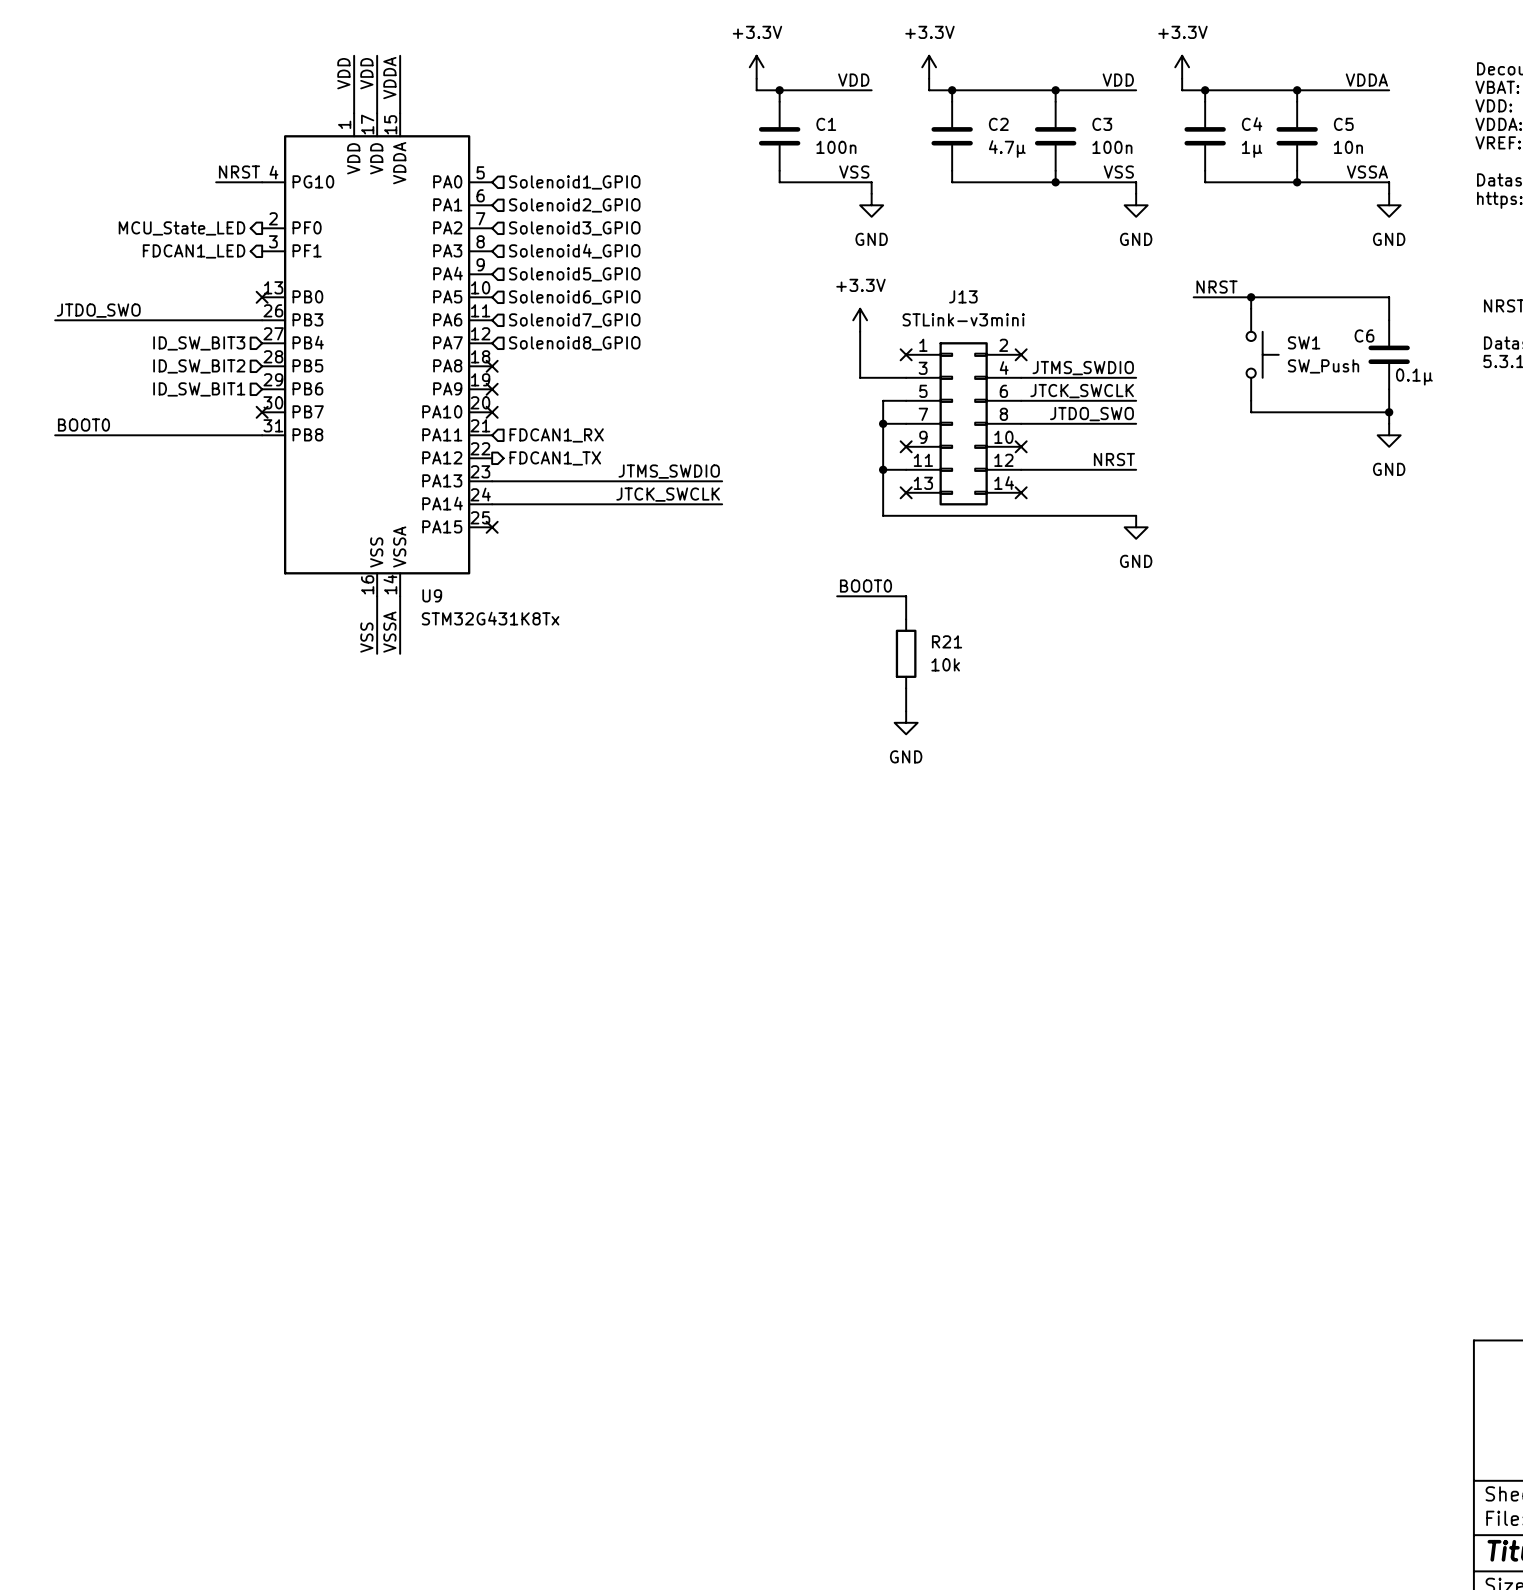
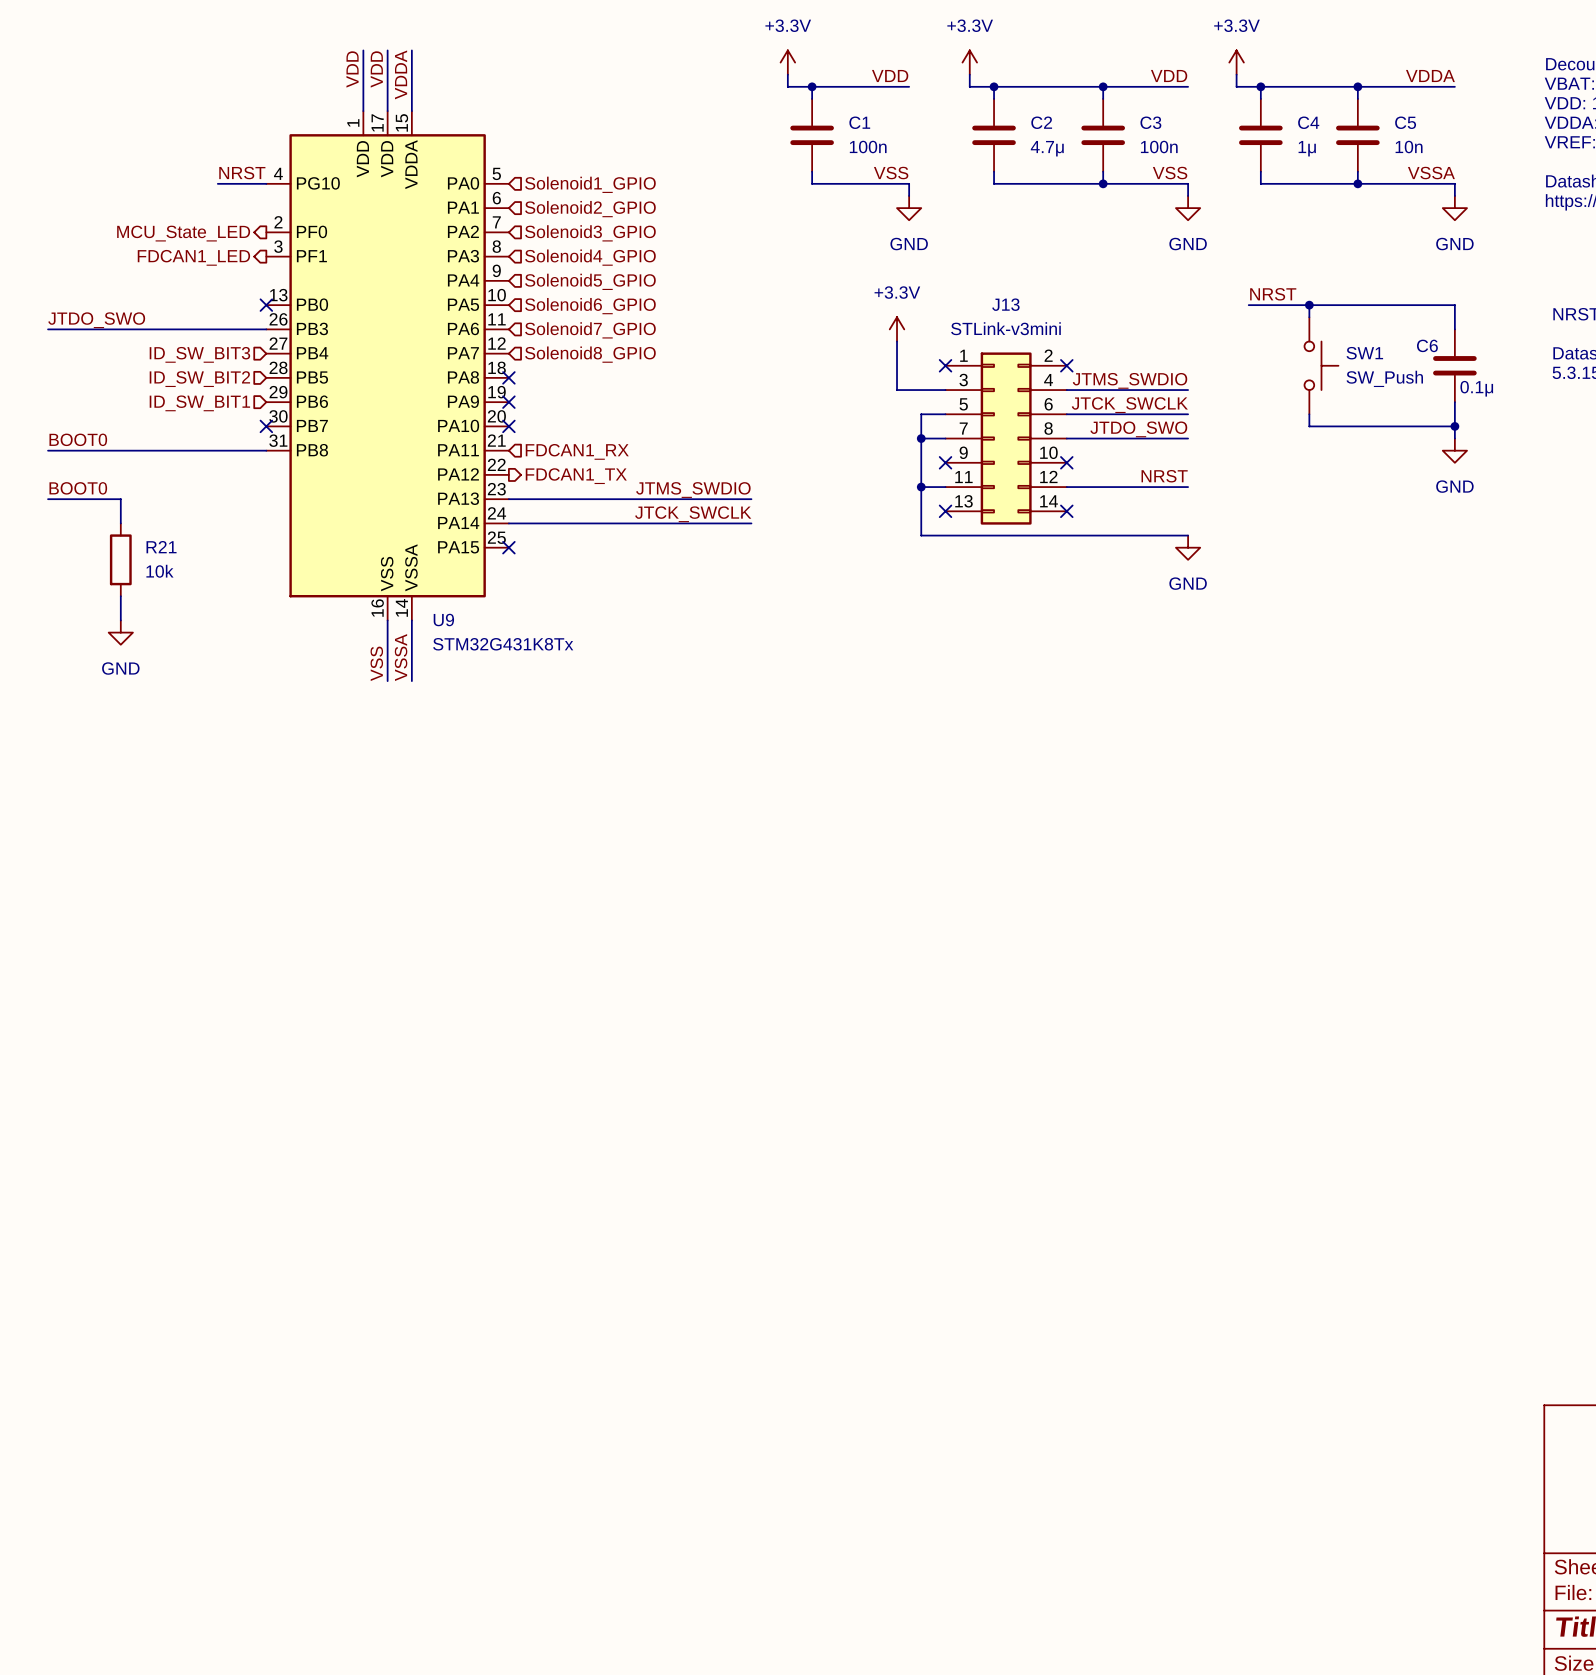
label: none -> BOOT0 (78, 488)
wire: none -> (48, 499) (120, 499) (120, 523)
wire: none -> (120, 596) (120, 620)
label: BOOT0 (865, 586) -> none
wire: (837, 596) (906, 596) (906, 619) -> none
power symbol: none -> GND (120, 632)
R21 position: (906, 653) -> (120, 559)
wire: (906, 688) (906, 711) -> none
power symbol: GND (906, 722) -> none

